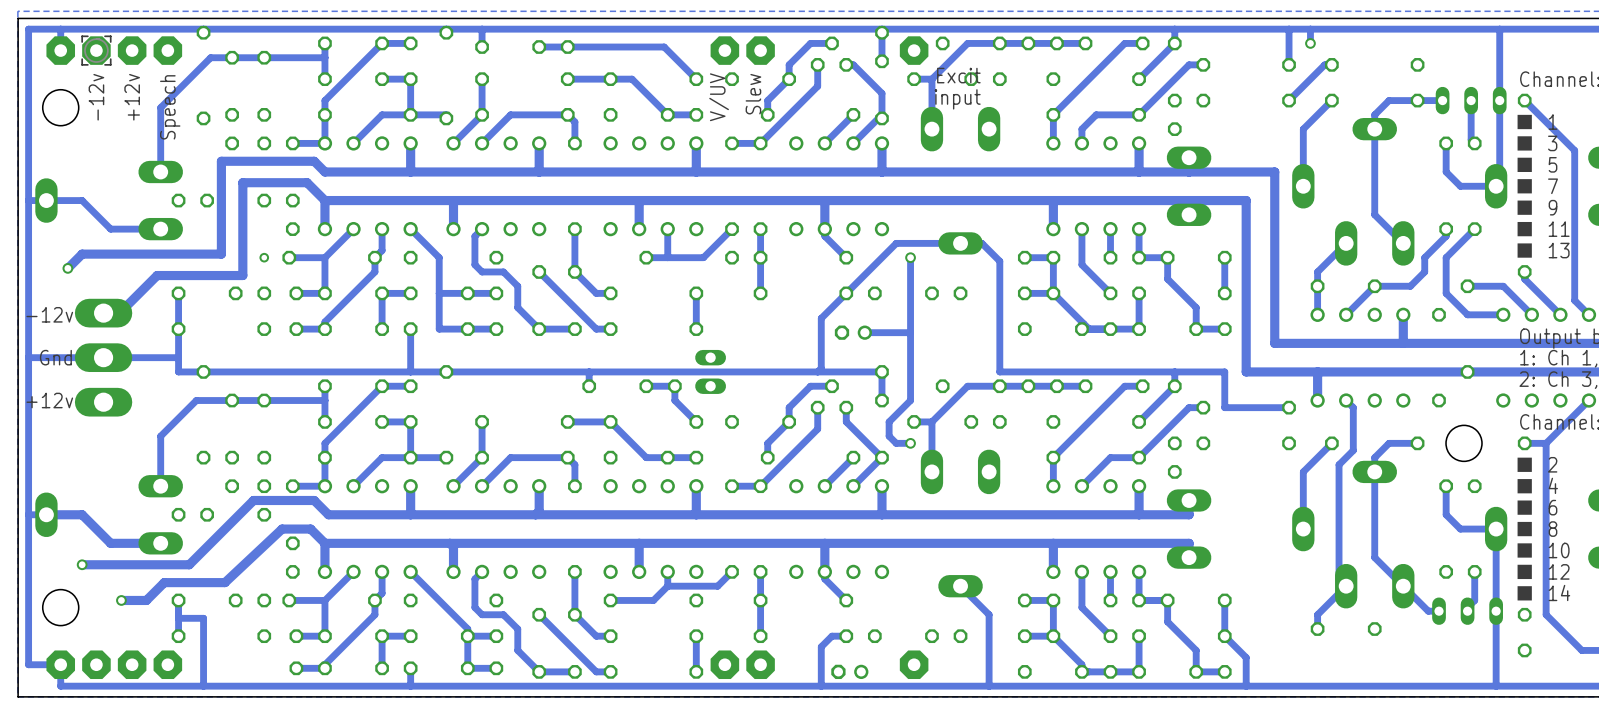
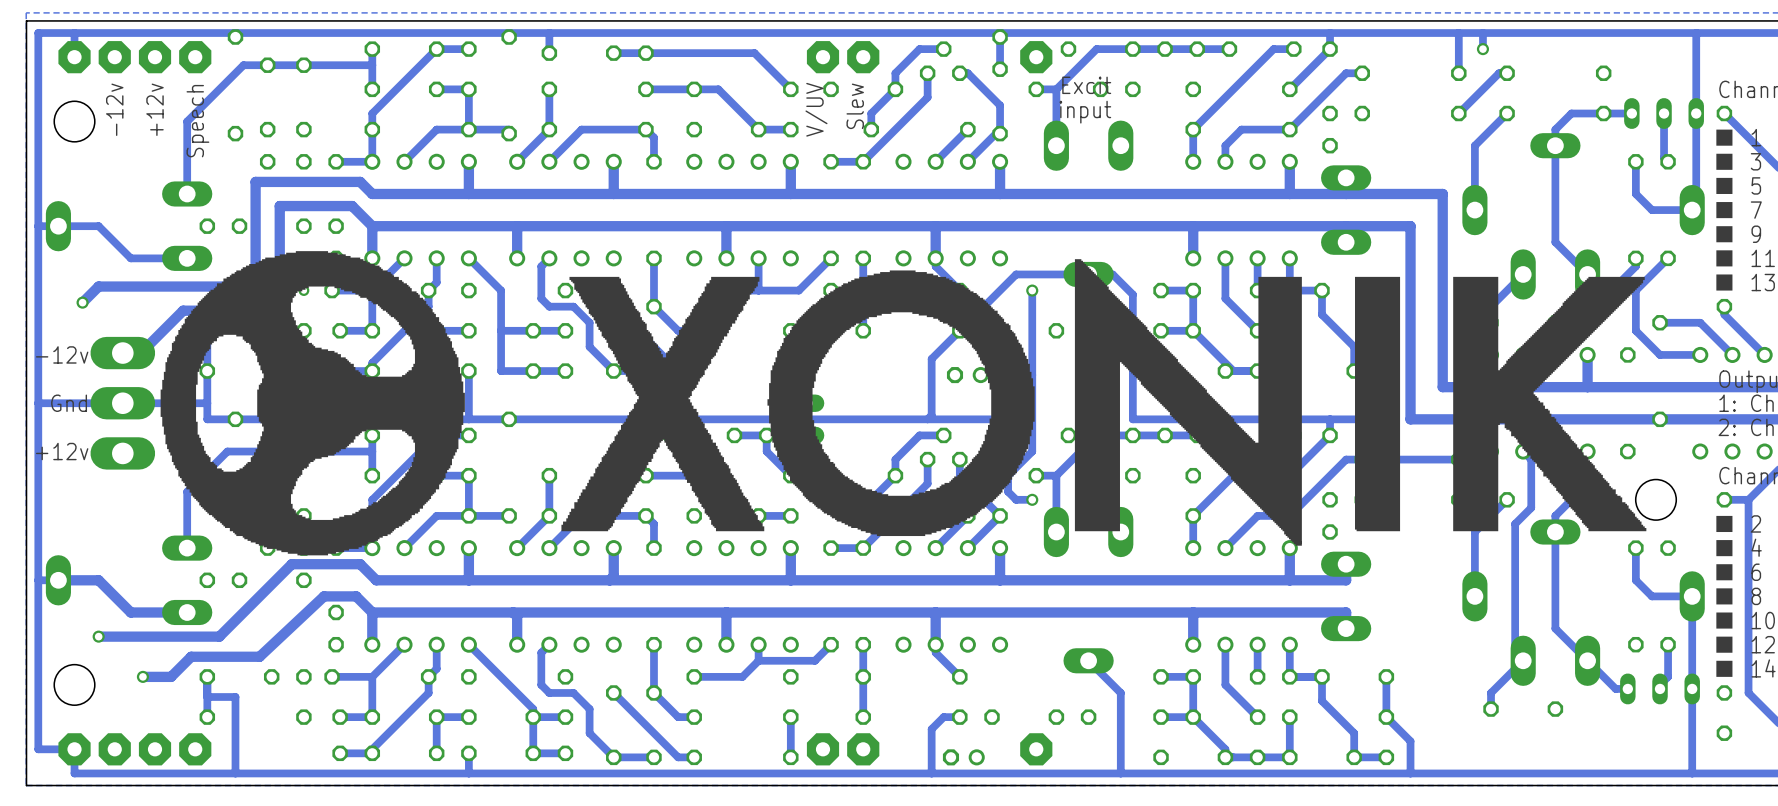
part side: bottom (96, 50) -> top (114, 57)
drawing: none -> [160, 251, 465, 556]
drawing: none -> [1074, 259, 1302, 546]
drawing: none -> [767, 270, 1035, 537]
drawing: none -> [561, 276, 765, 532]
drawing: none -> [1354, 276, 1401, 532]
drawing: none -> [1453, 276, 1647, 532]

